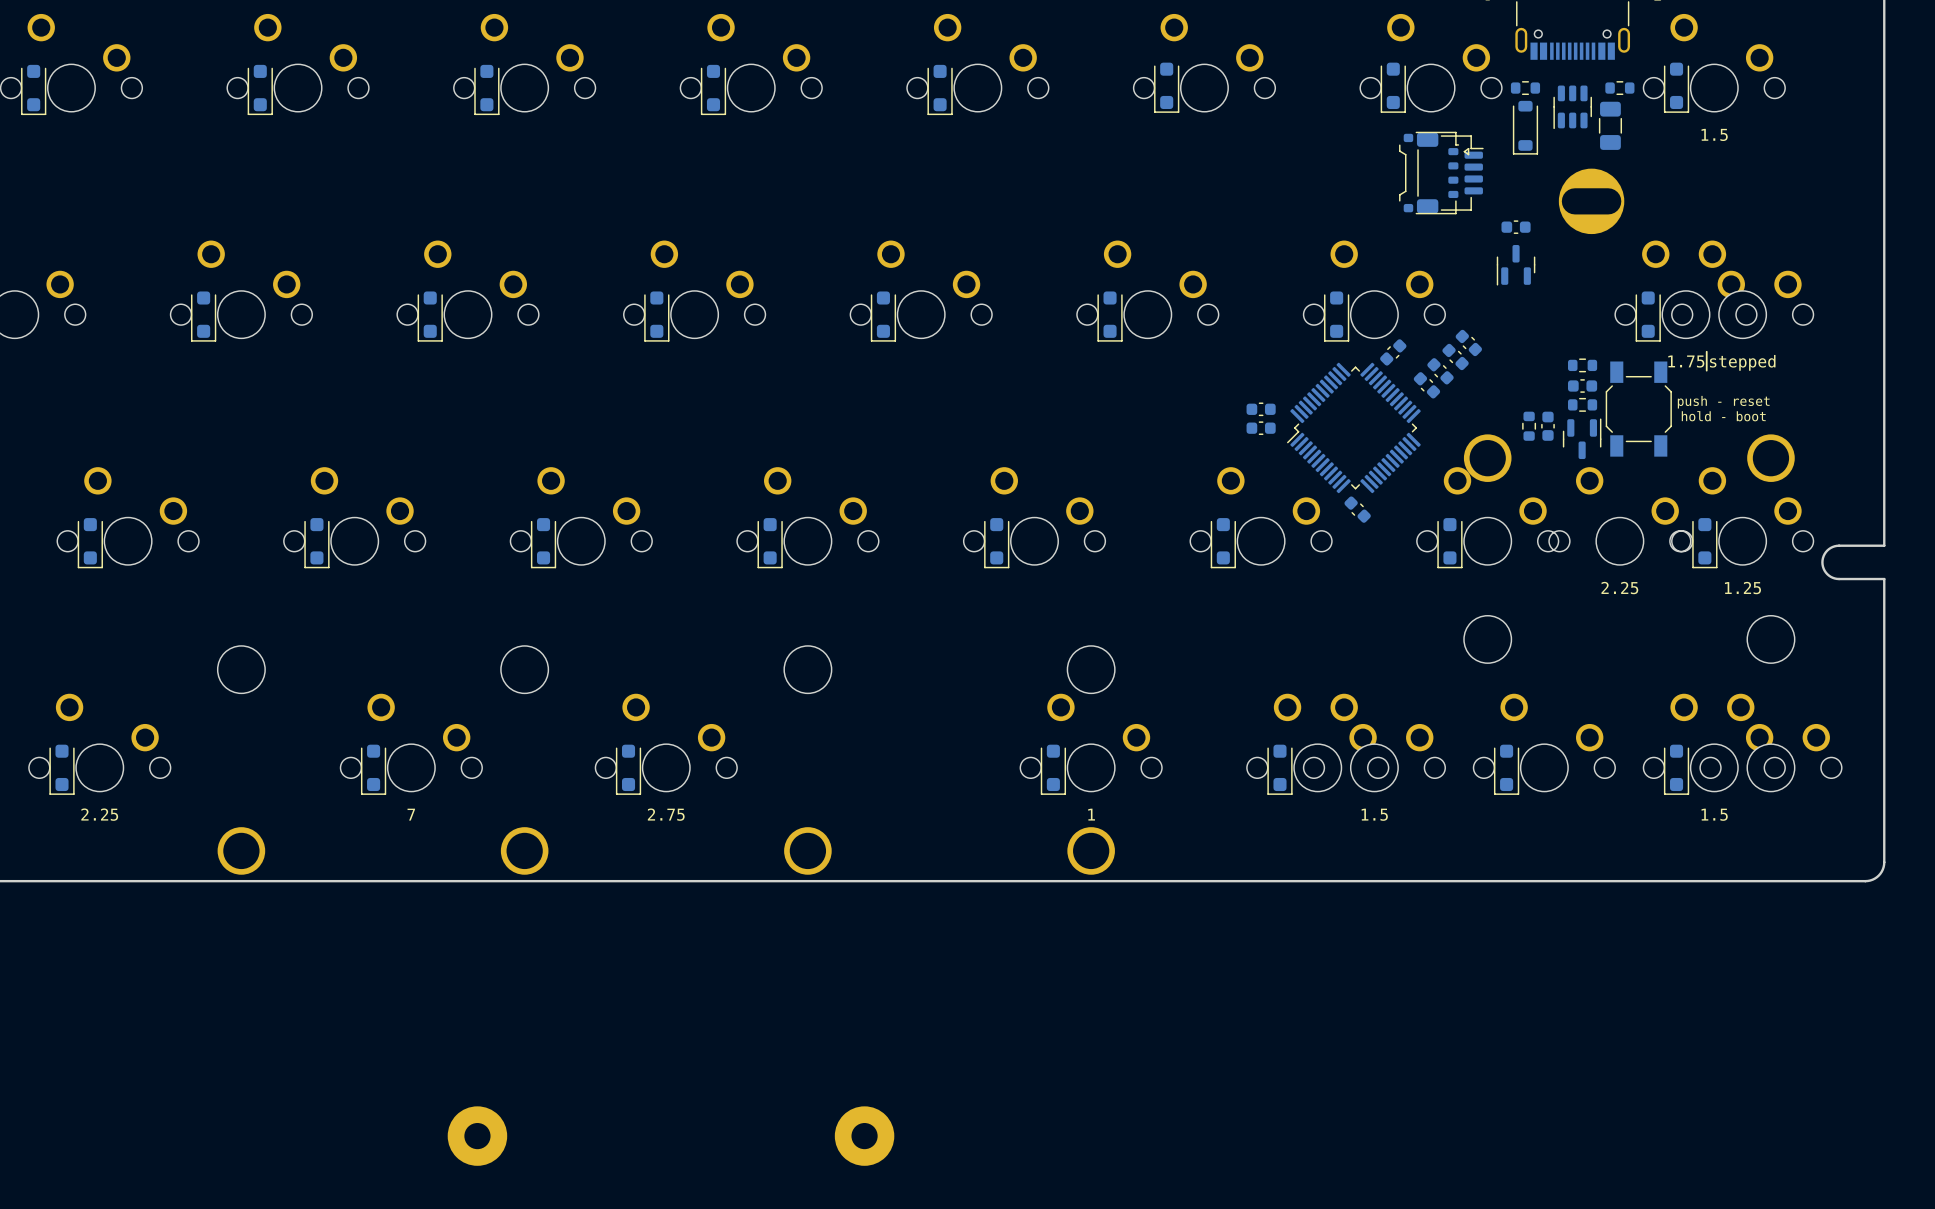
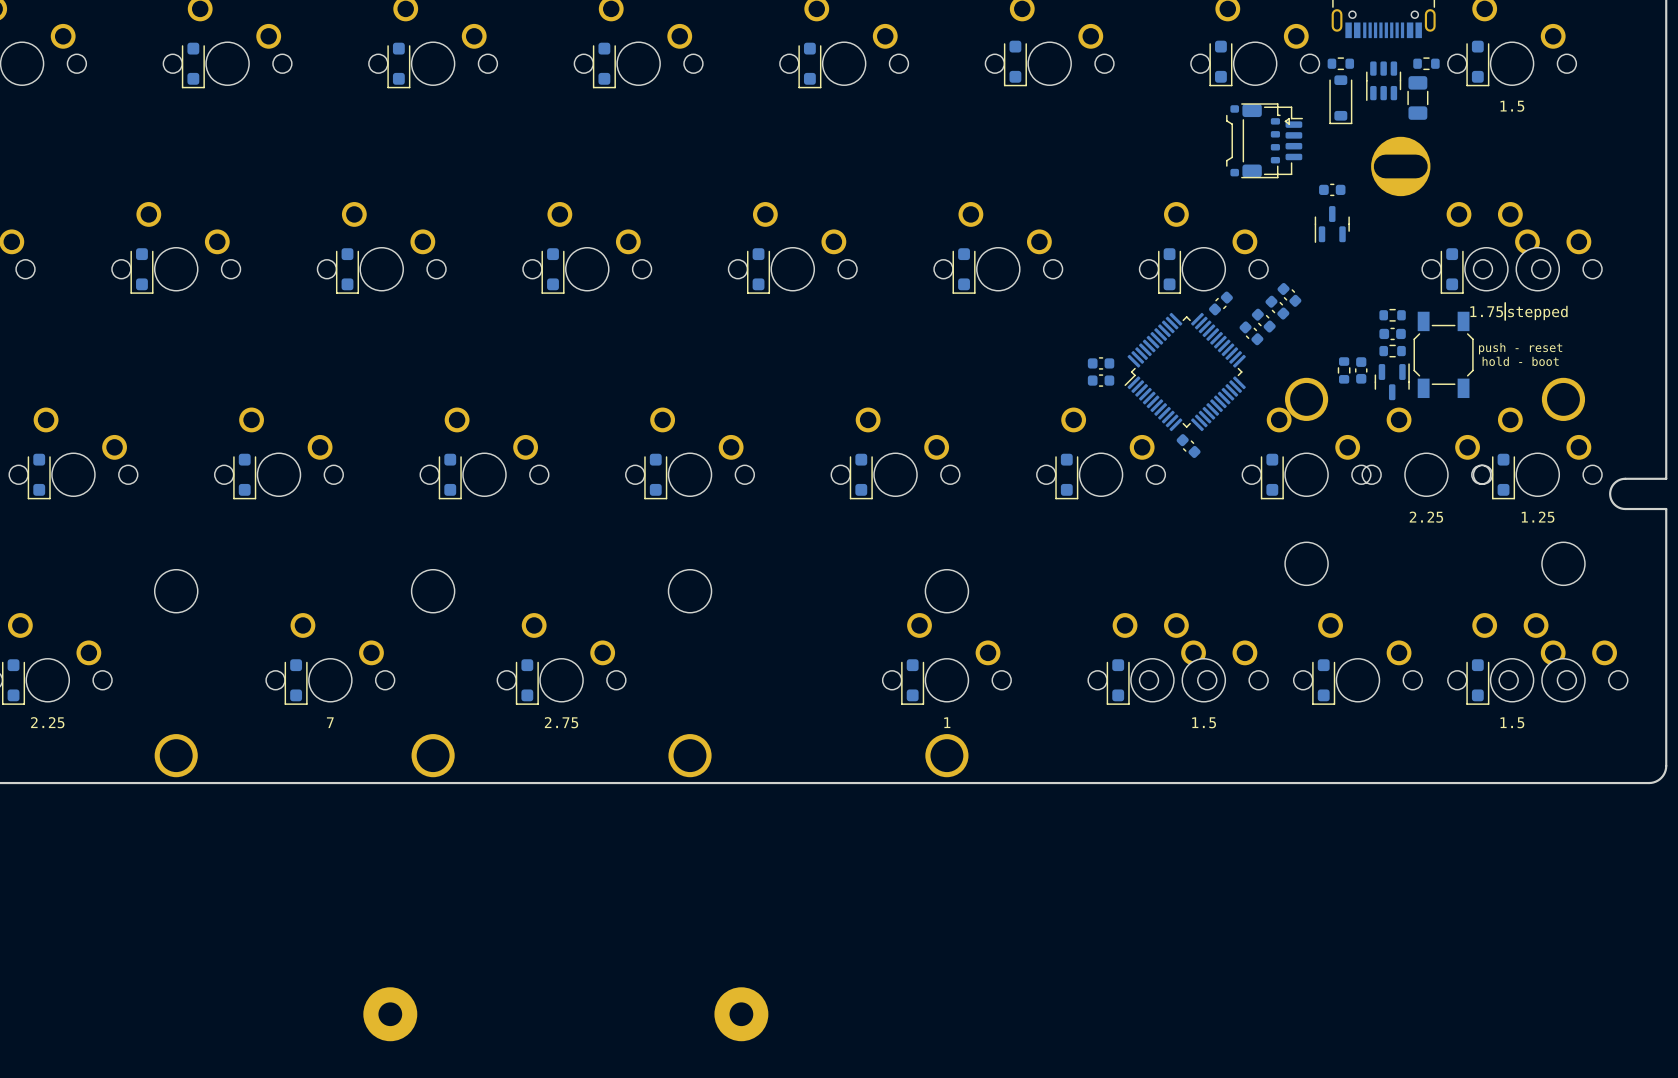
part: (1261, 409) -> none
part: none -> (1101, 363)
part: (1261, 428) -> none
part: none -> (1101, 380)

